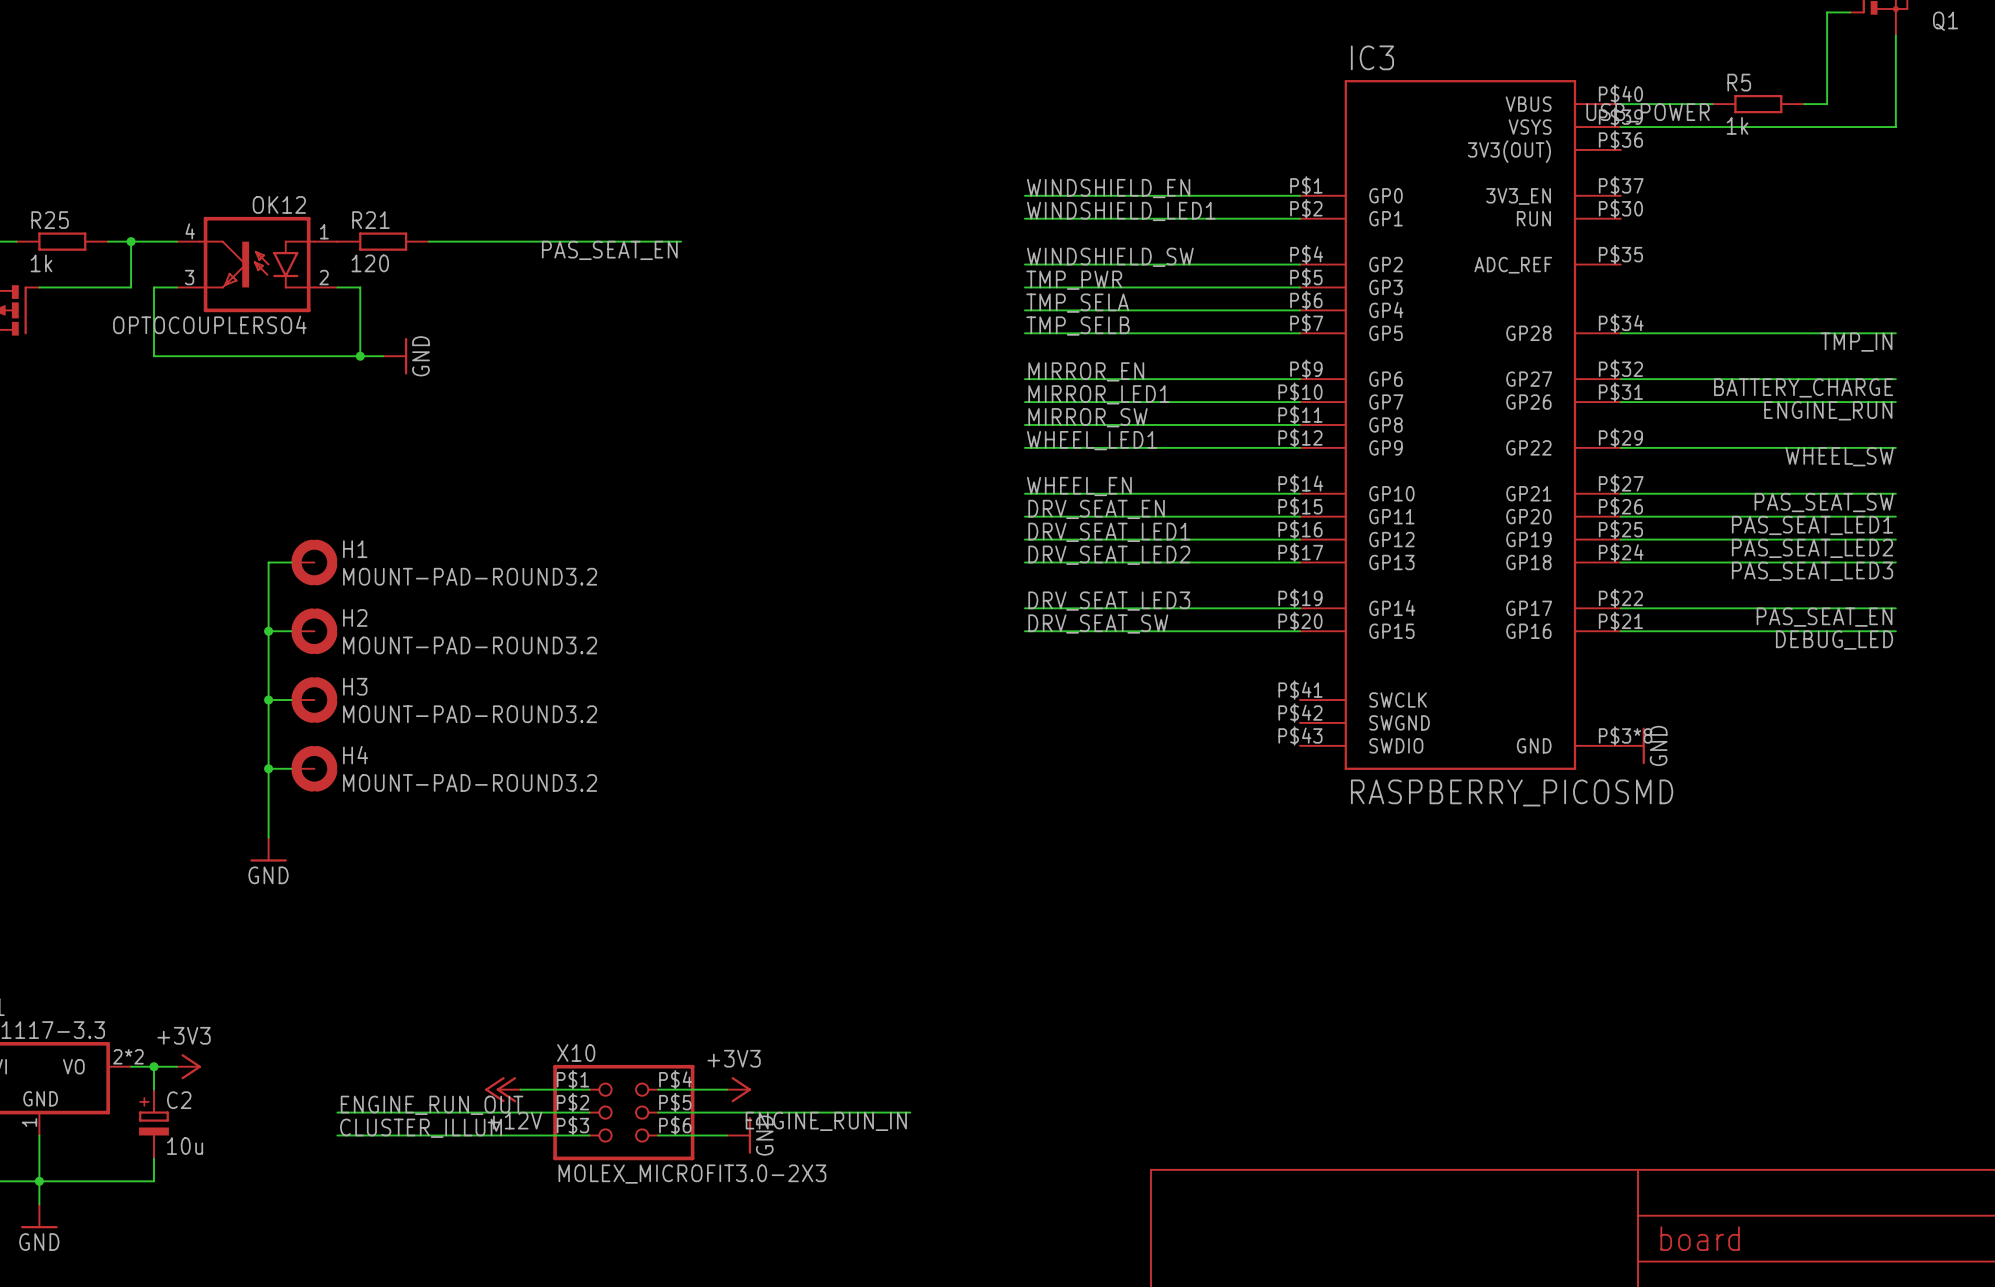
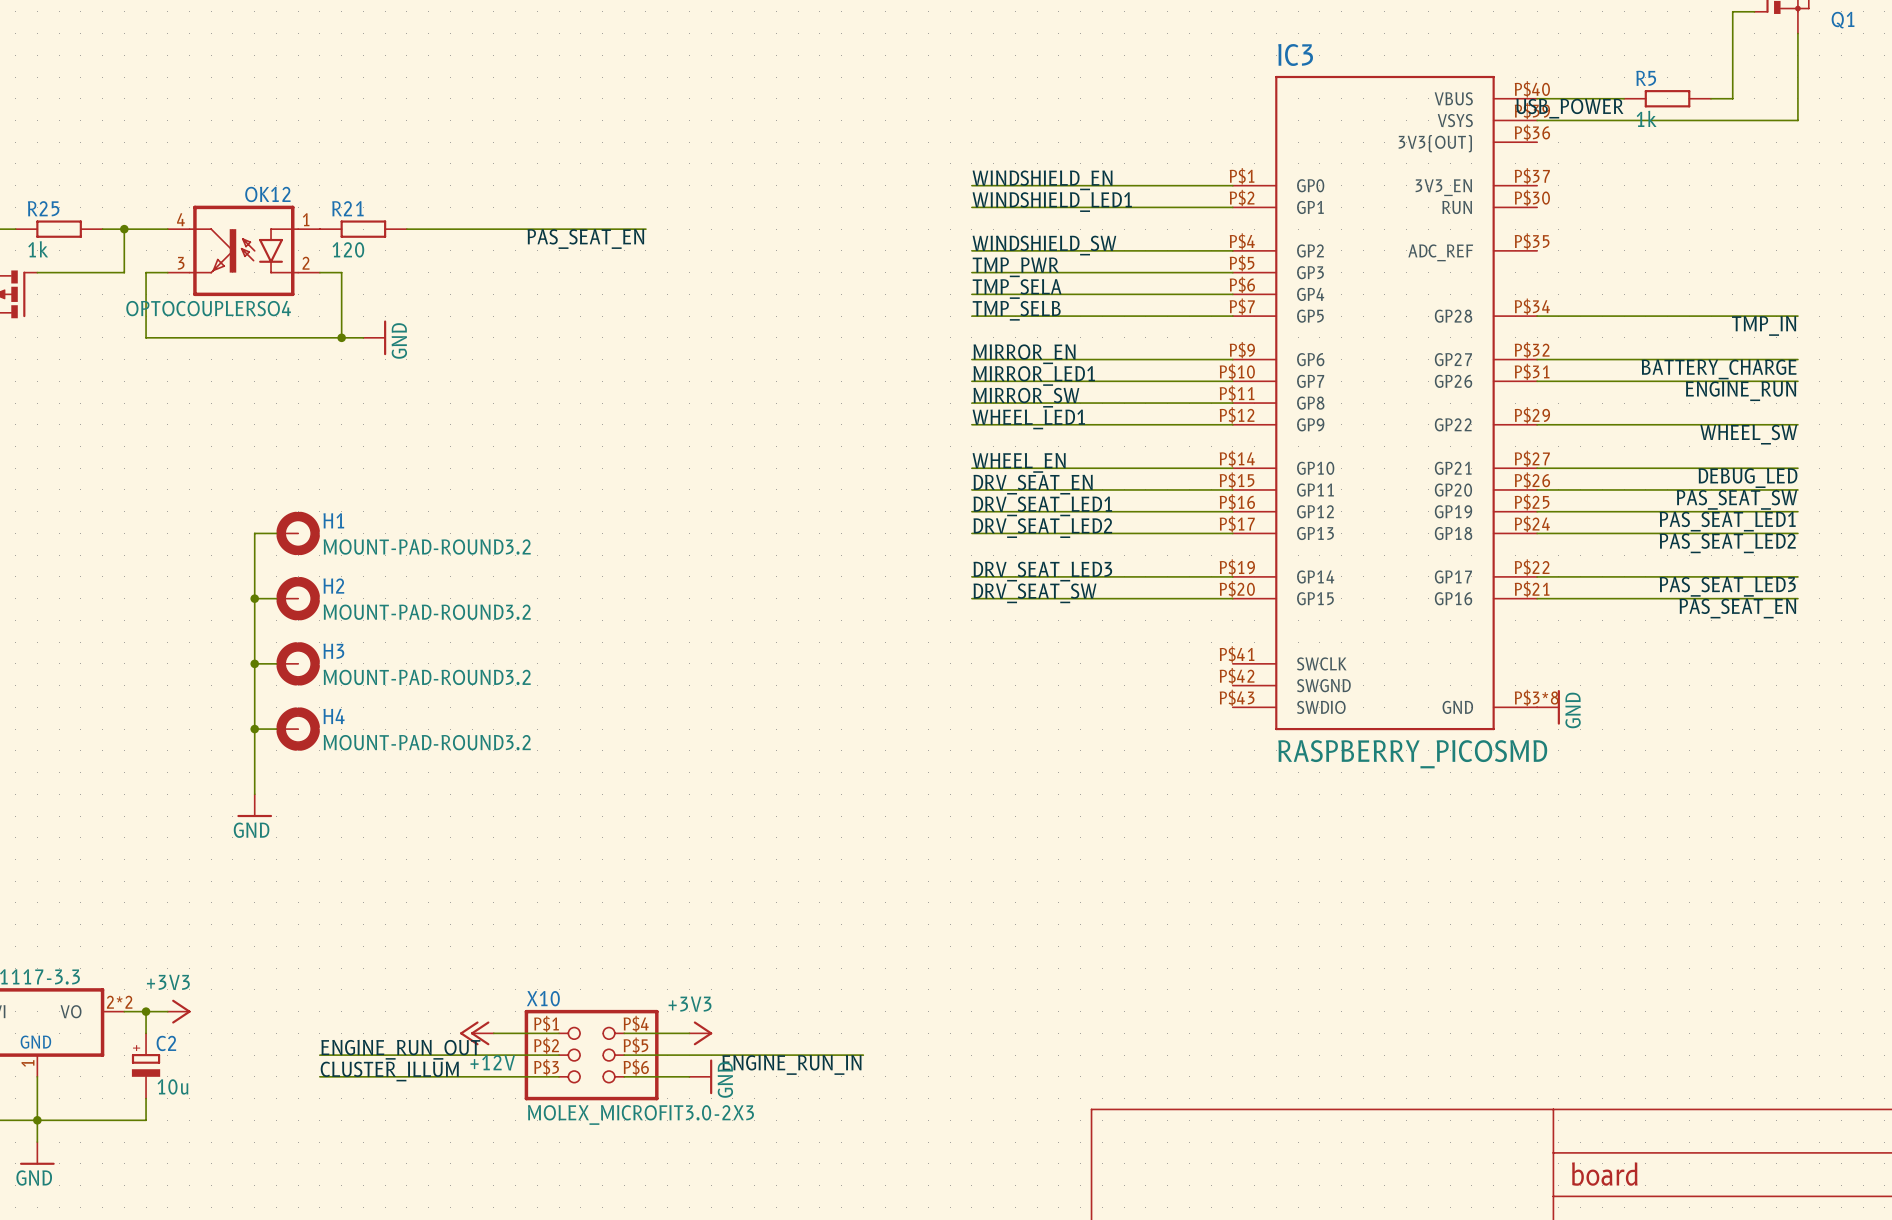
label: PAS_SEAT_SW (1824, 502) -> DEBUG_LED (1747, 478)
label: PAS_SEAT_LED1 (1812, 525) -> PAS_SEAT_SW (1736, 499)
label: PAS_SEAT_LED2 (1812, 548) -> PAS_SEAT_LED1 (1727, 521)
label: PAS_SEAT_LED3 (1812, 571) -> PAS_SEAT_LED2 (1727, 543)
label: PAS_SEAT_EN (1824, 617) -> PAS_SEAT_LED3 (1727, 586)
label: DEBUG_LED (1834, 640) -> PAS_SEAT_EN (1737, 608)

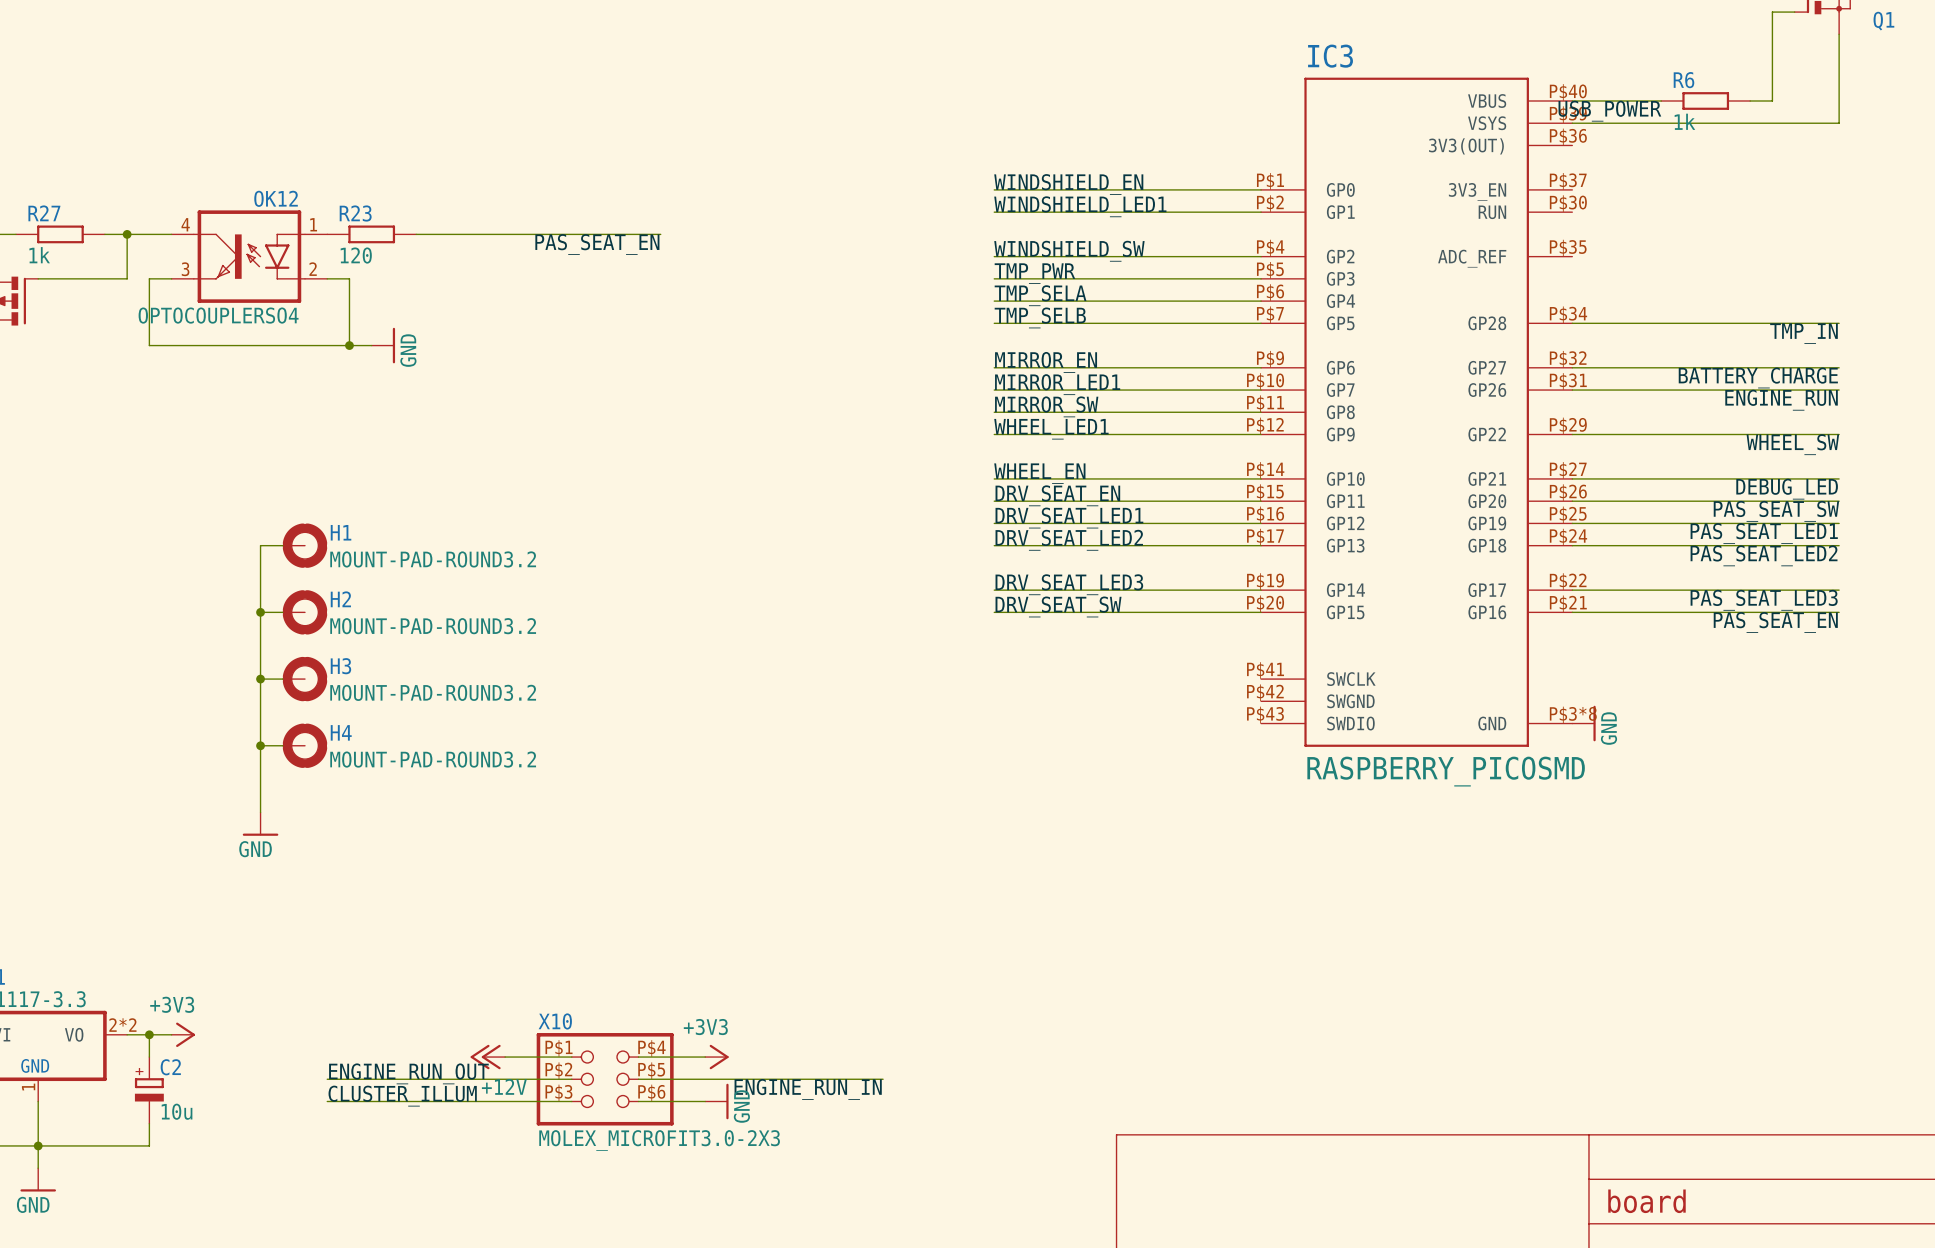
R5 name: R5 (1646, 78) -> R6 (1683, 80)
R25 name: R25 (43, 208) -> R27 (44, 213)
R21 name: R21 (347, 208) -> R23 (355, 213)

